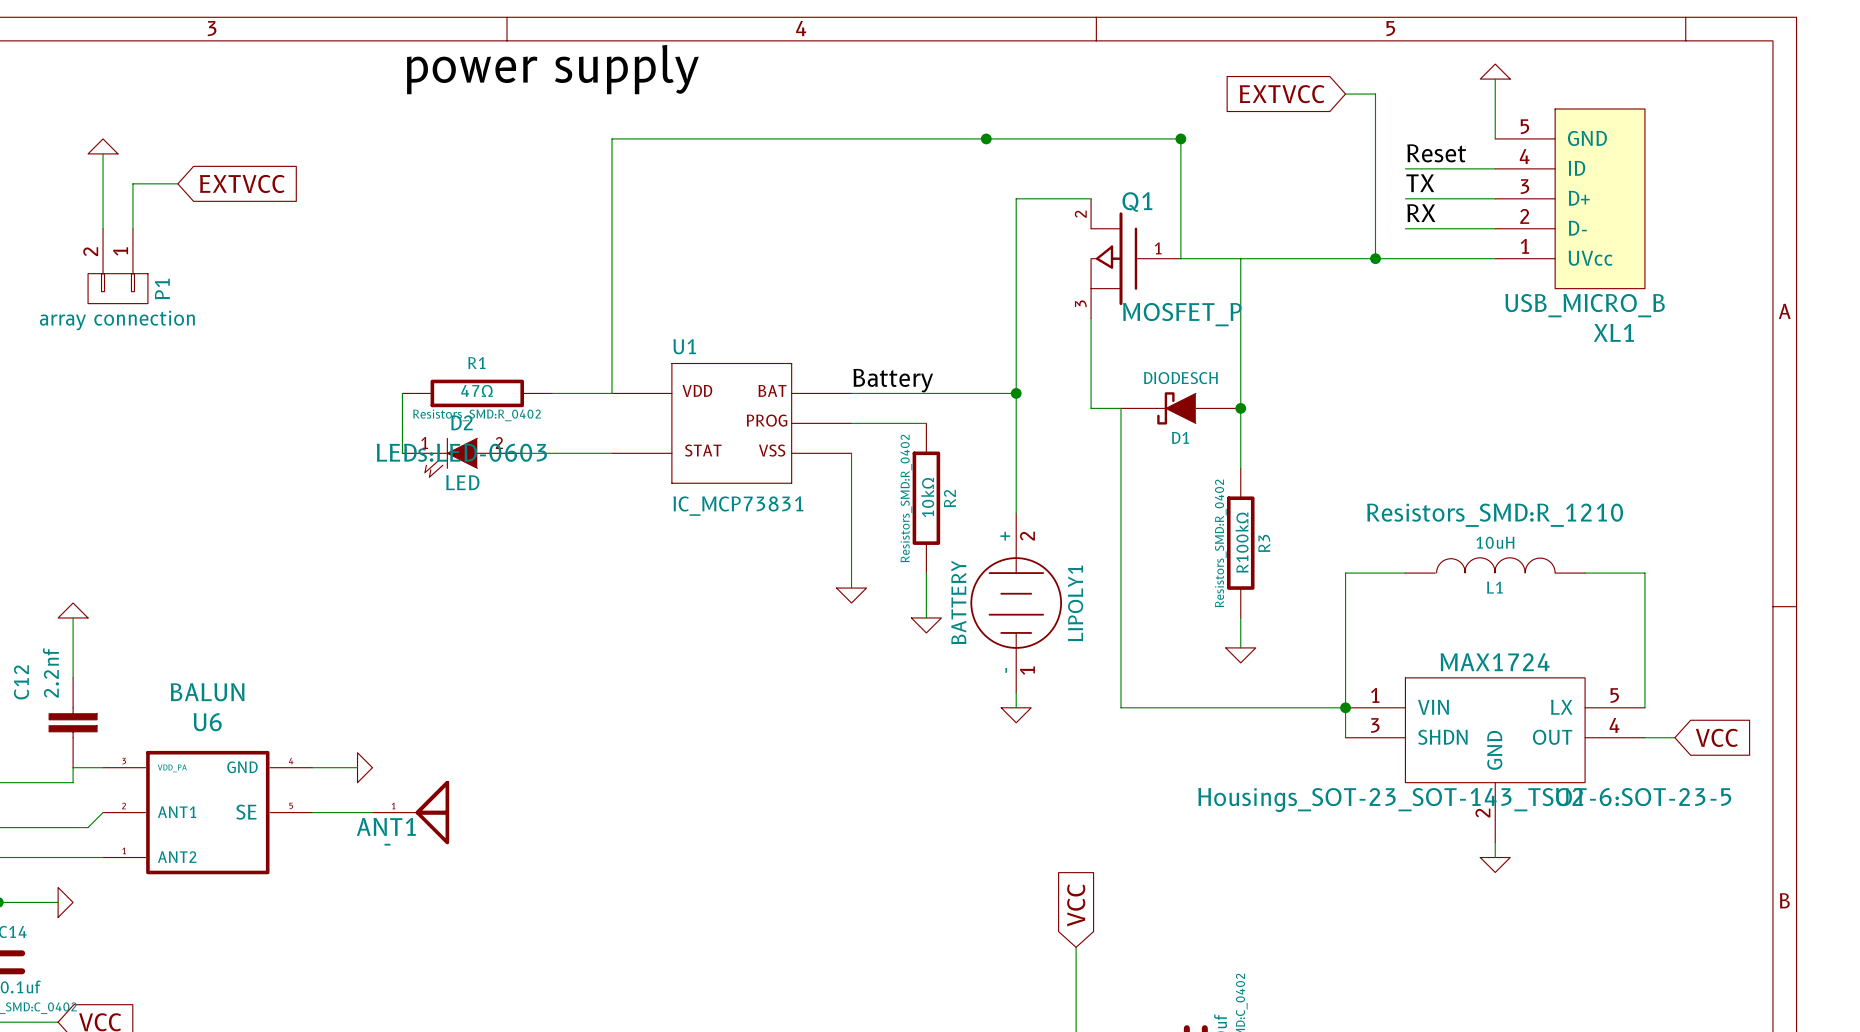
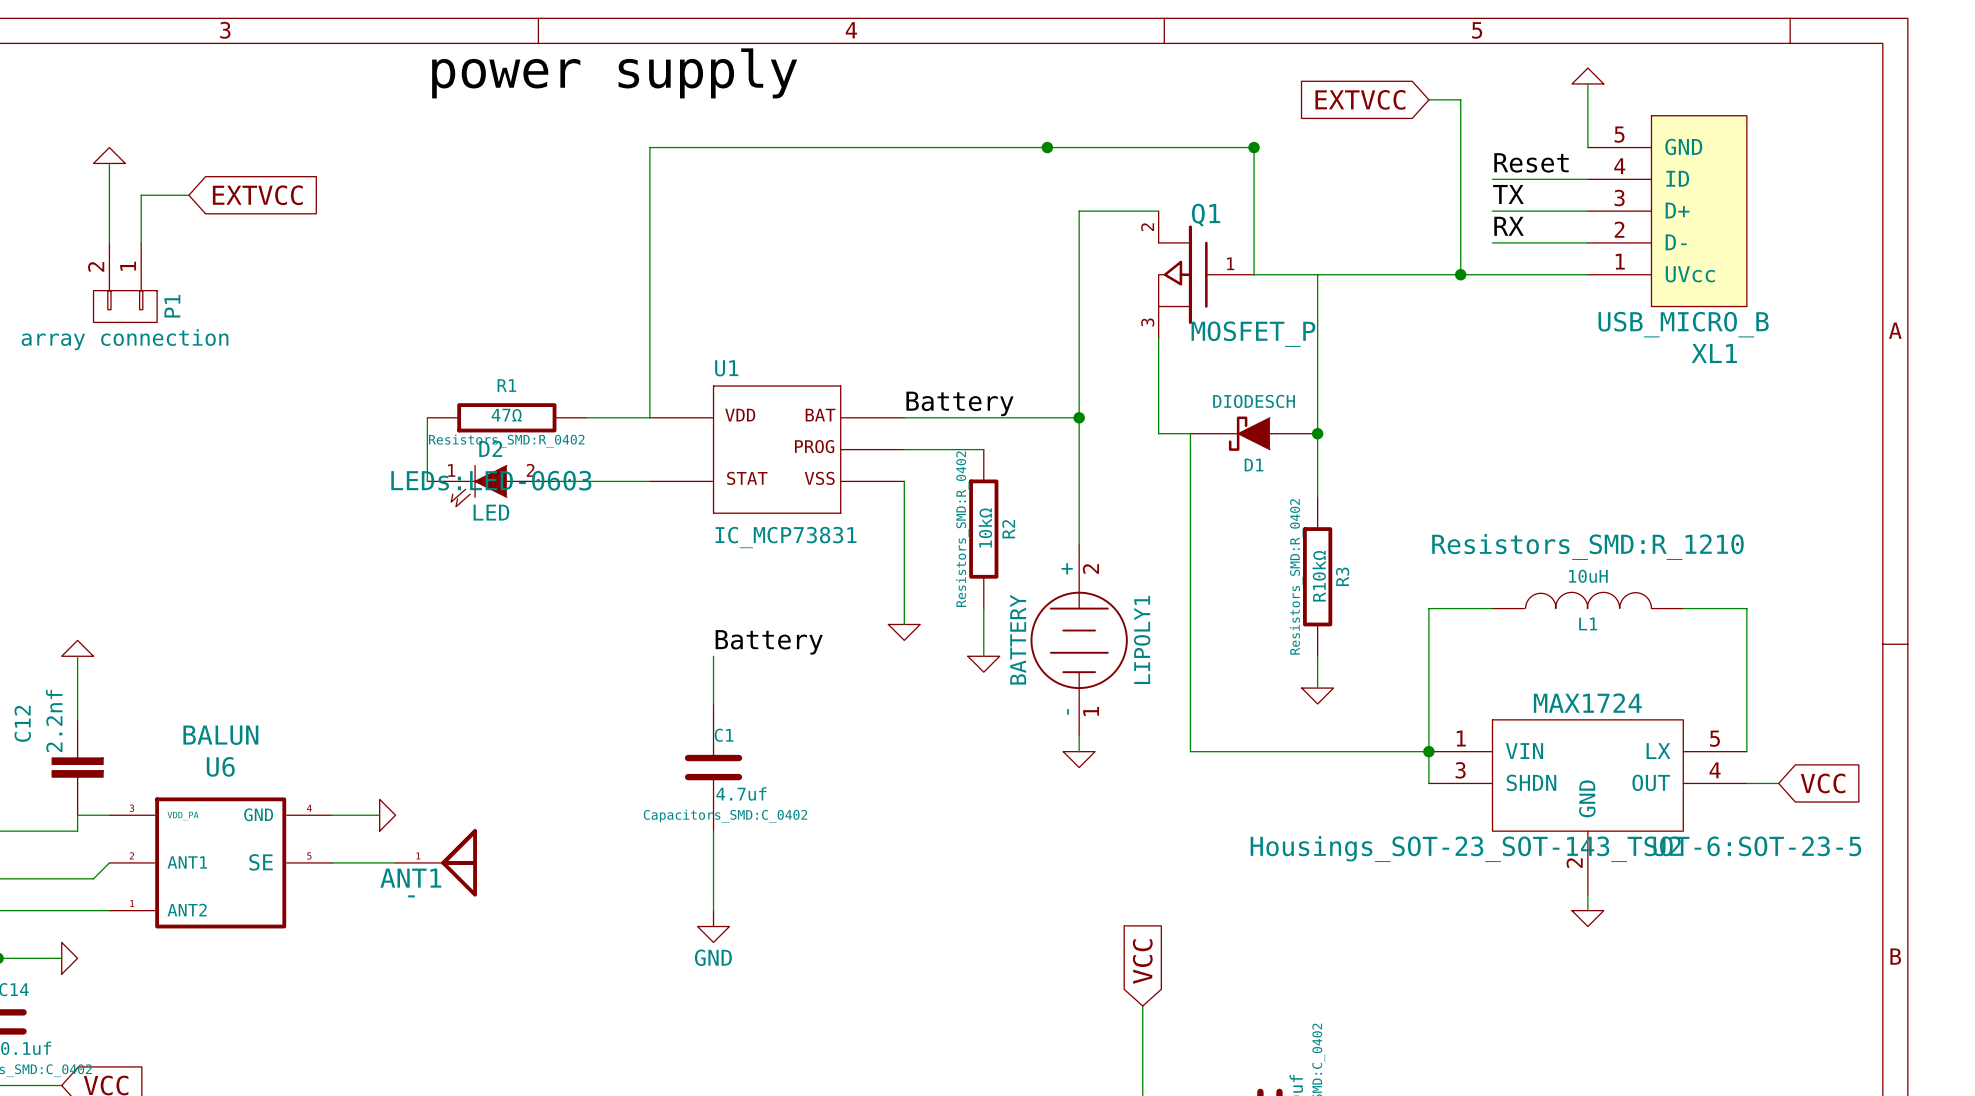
R3 value: R100kΩ (1242, 542) -> R10kΩ (1319, 576)
label: none -> Battery (769, 642)
wire: none -> (713, 656) (713, 703)
C1: none -> 4.7uf (713, 767)
wire: none -> (713, 831) (713, 910)
power symbol: none -> GND (713, 926)

